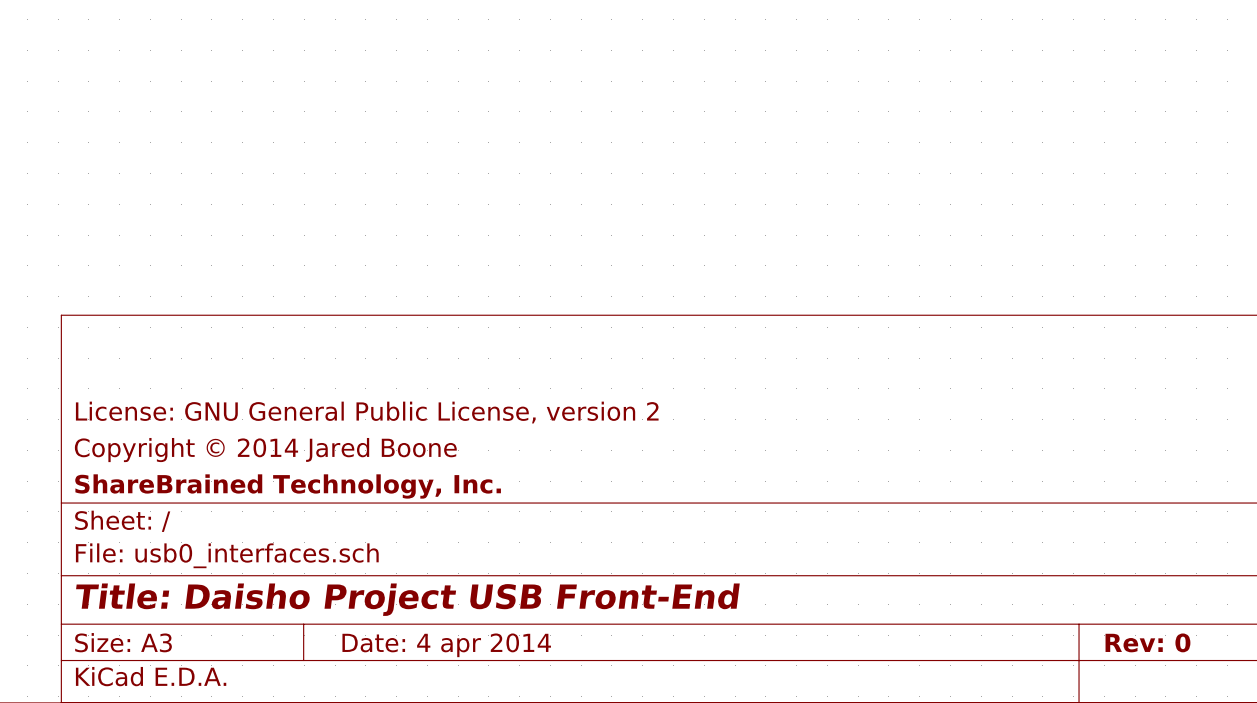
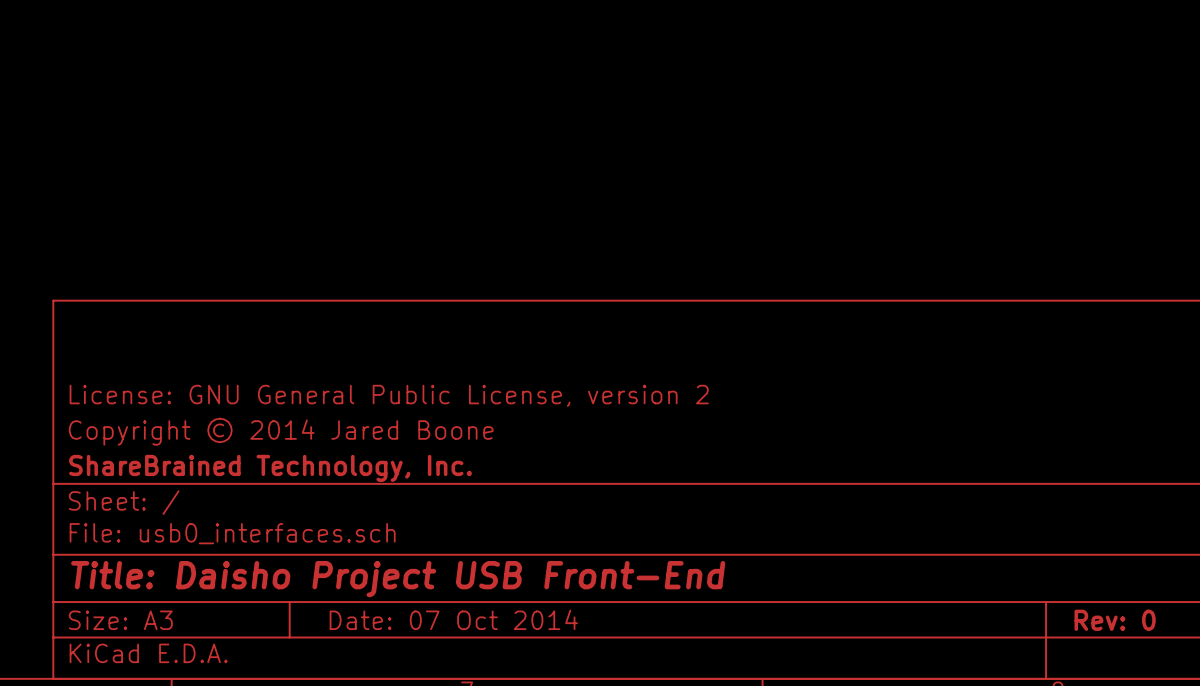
title block: Date: 4 apr 2014 (446, 645) -> Date: 07 Oct 2014 (453, 619)

